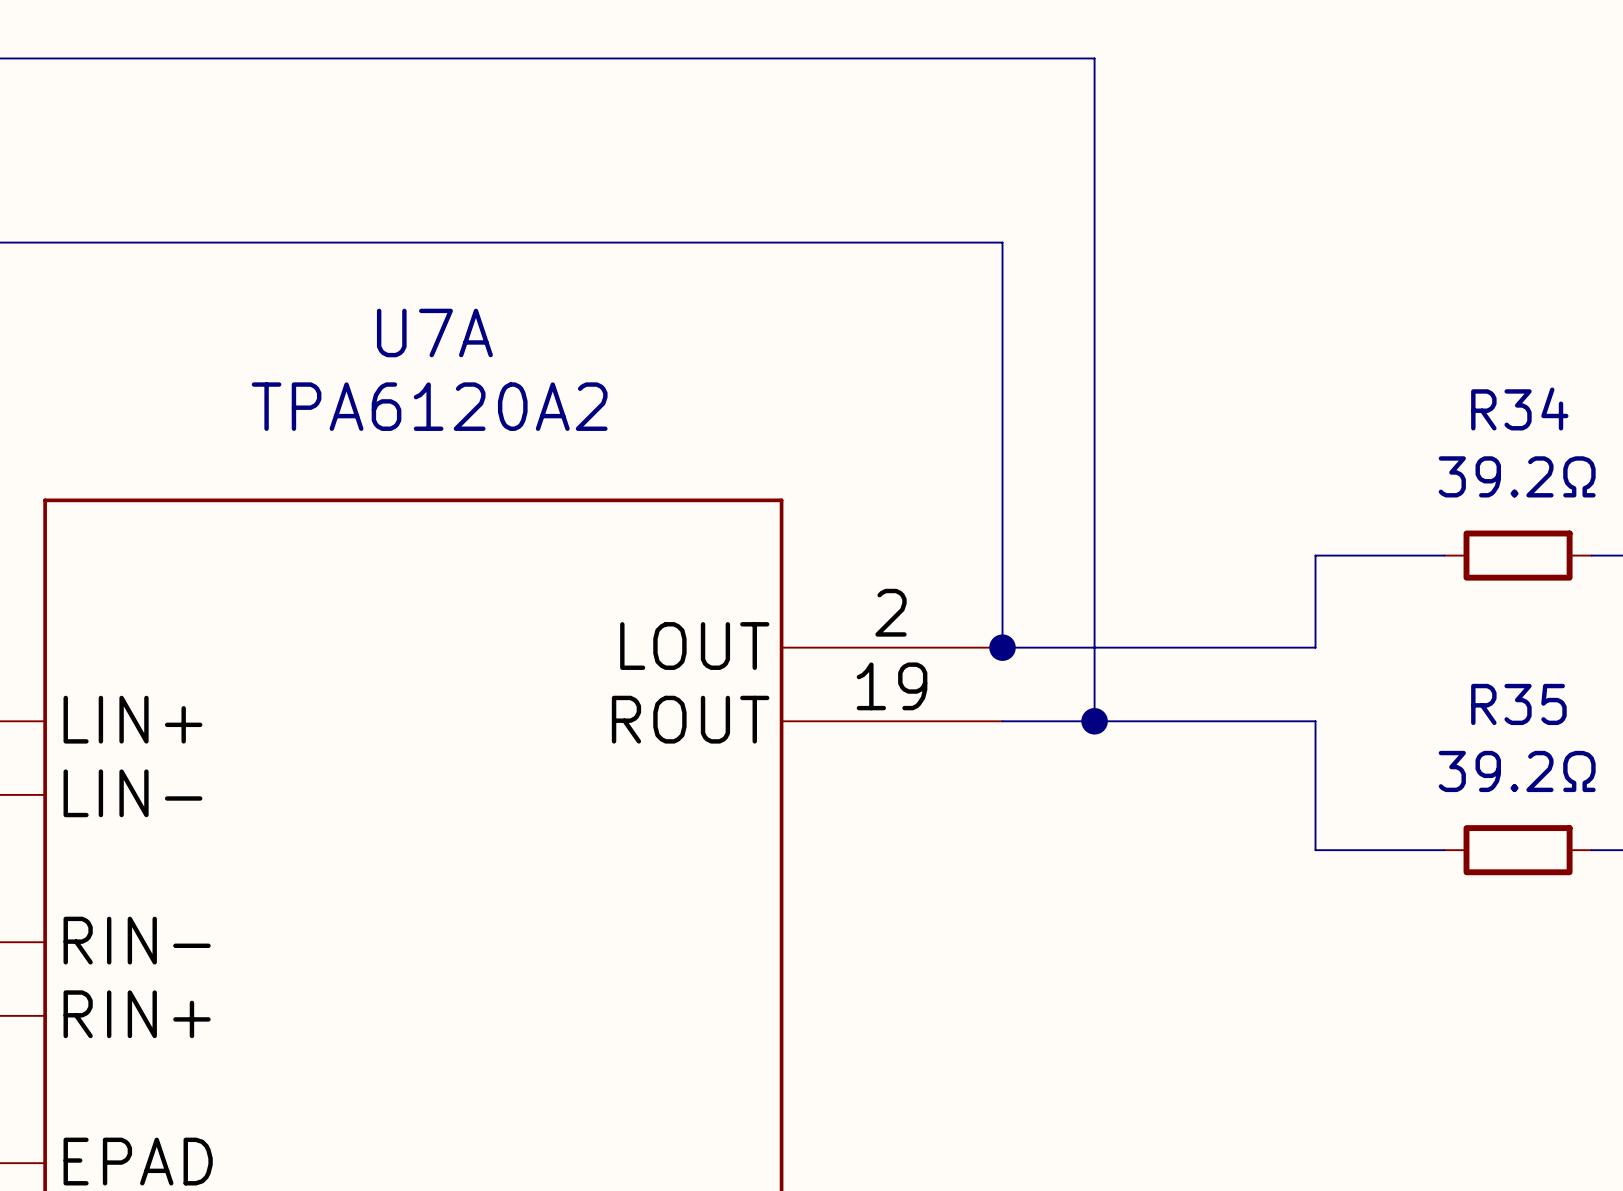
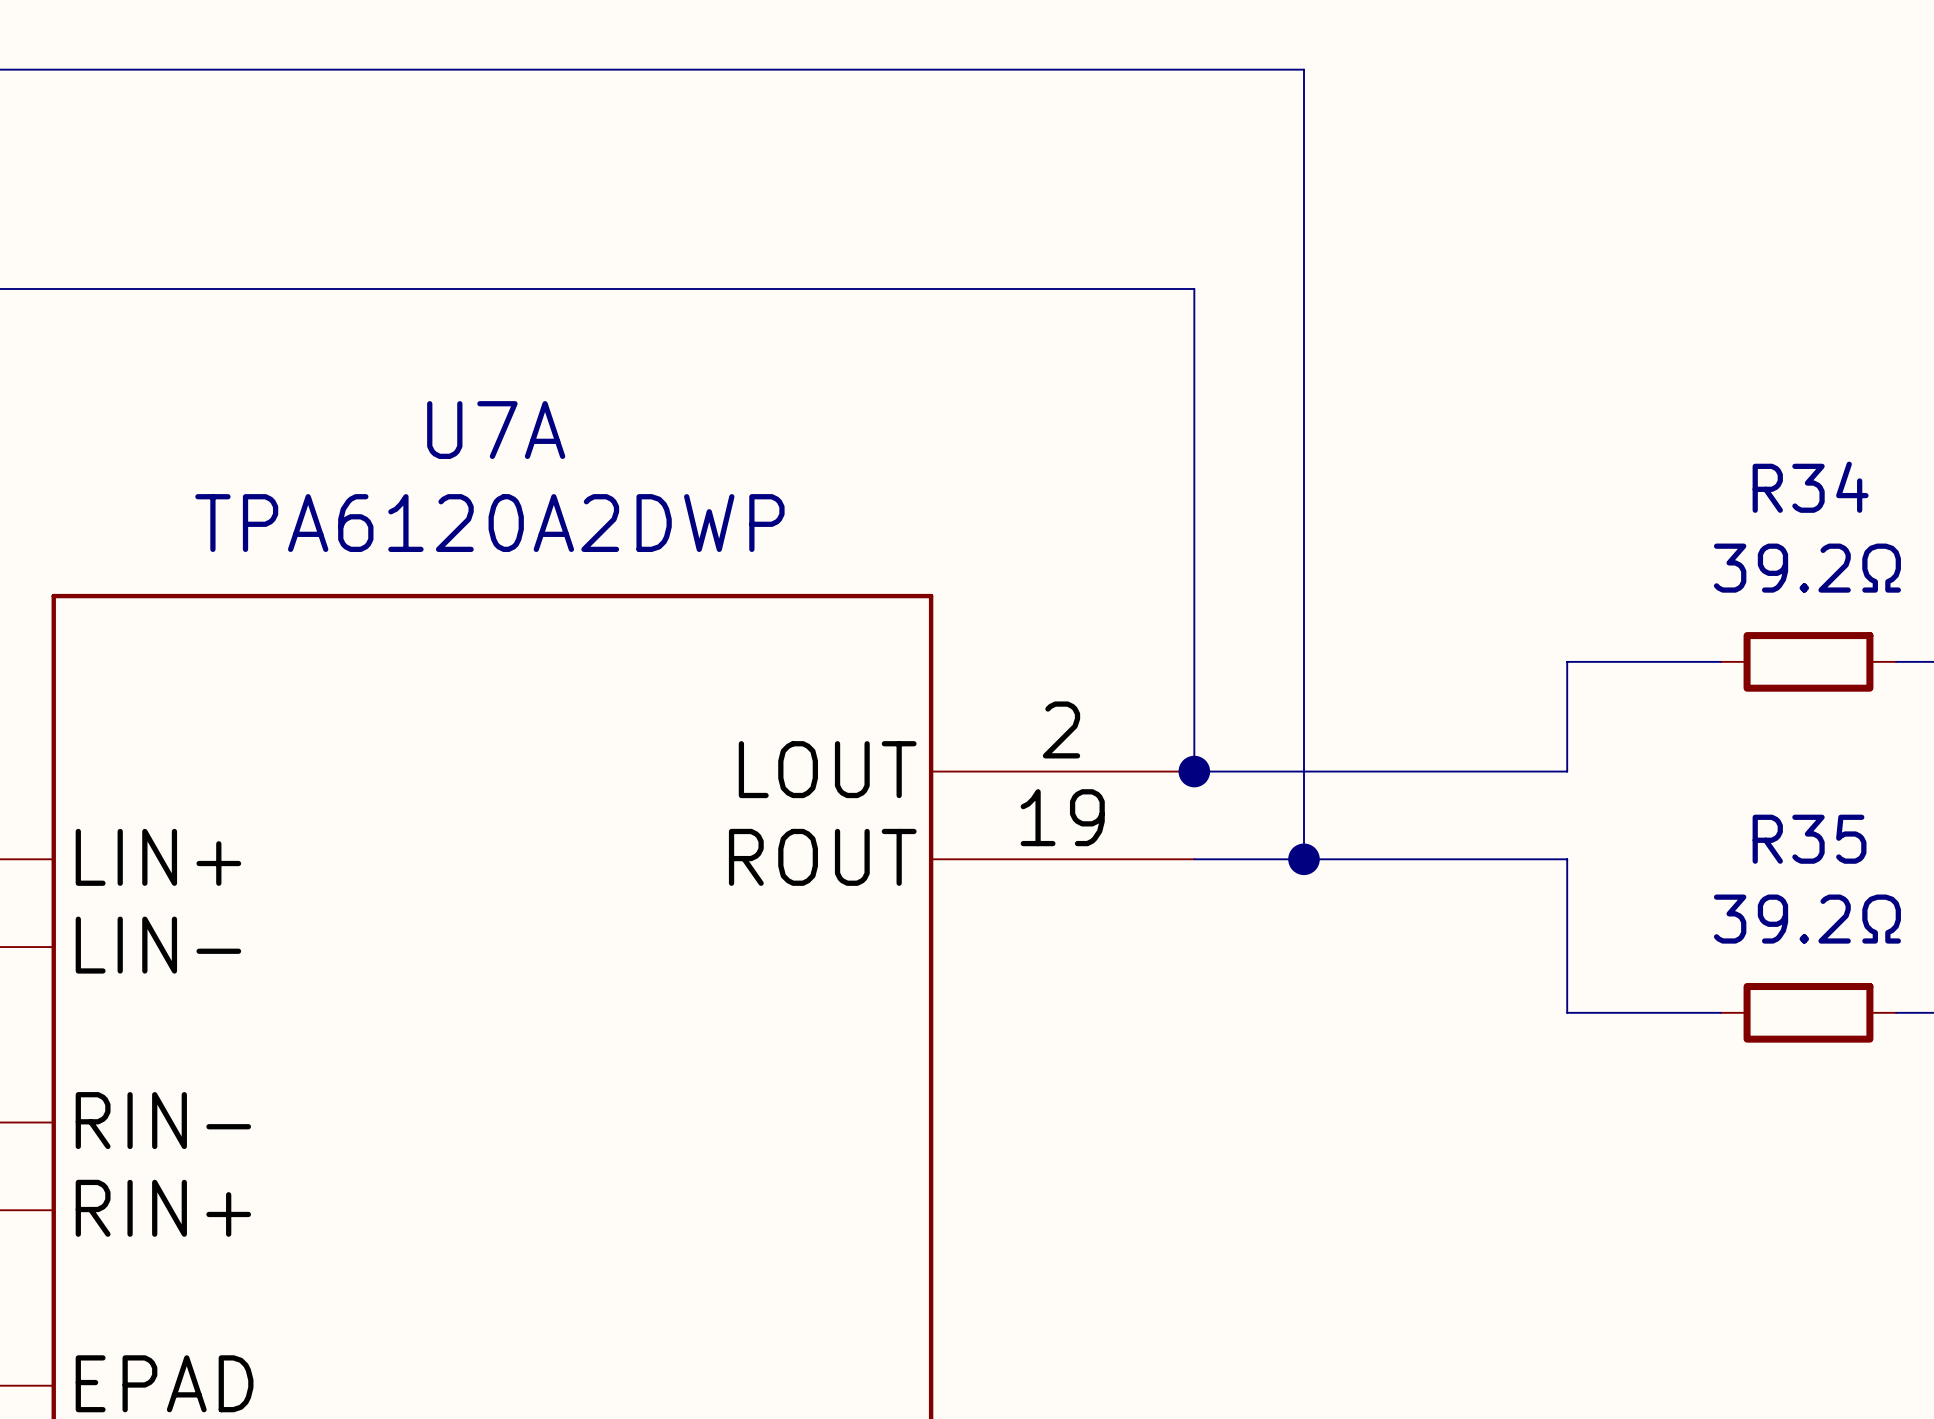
U7A name position: U7A (434, 332) -> U7A (496, 430)
U7A value: TPA6120A2 (429, 406) -> TPA6120A2DWP (489, 523)

